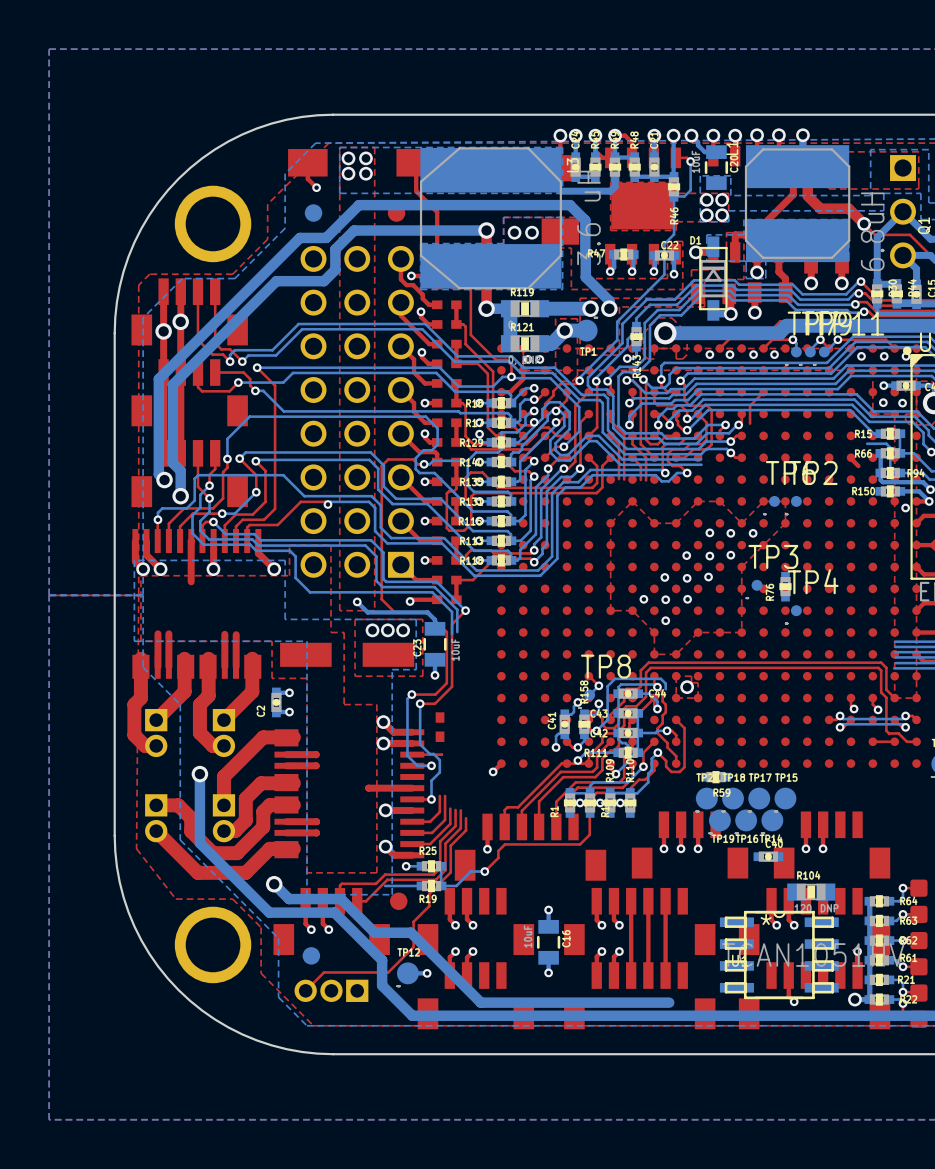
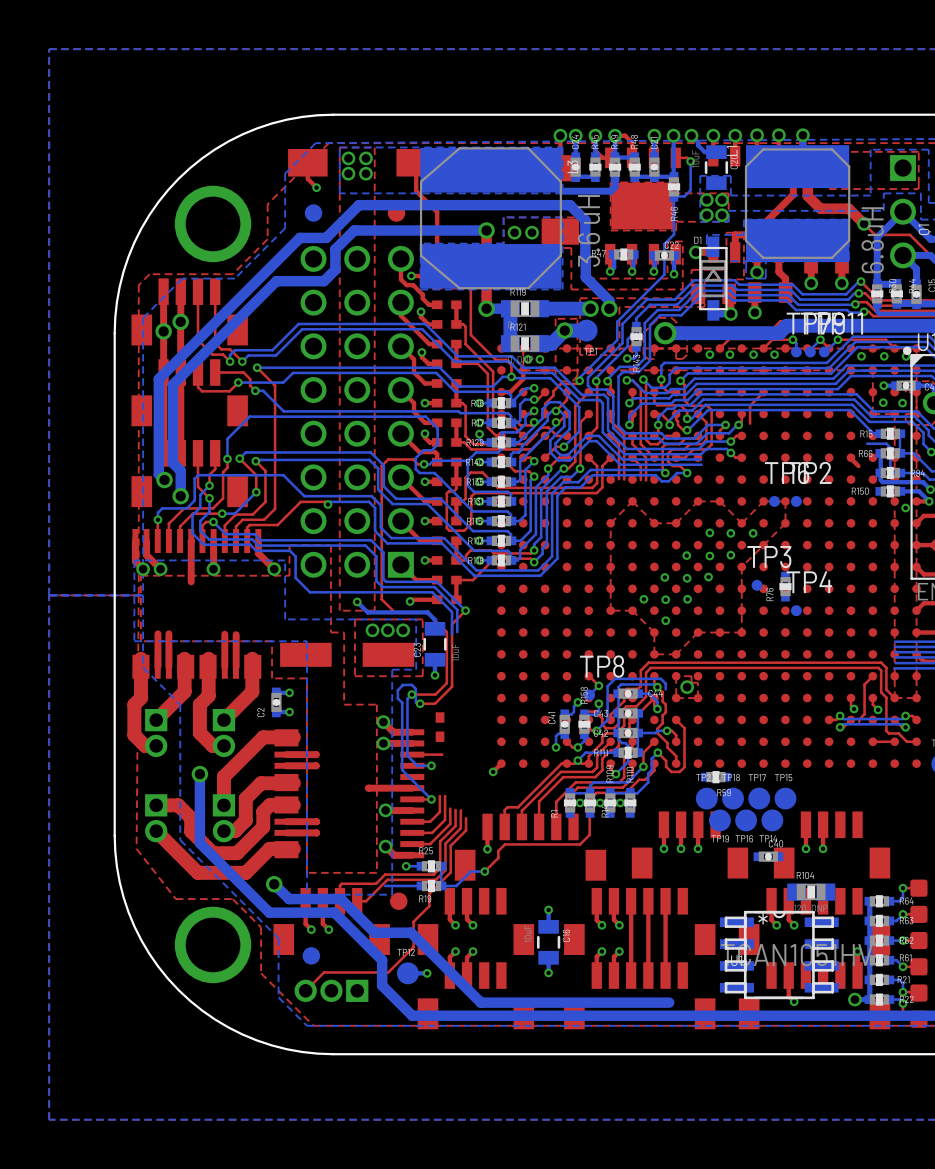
top track: none -> (872, 676) (864, 684) (864, 714) (859, 721)
bottom track: (420, 703) (420, 744) (429, 754) (433, 754) (439, 760) (439, 772) (431, 780) (431, 799) -> (415, 702) (415, 688) (411, 684) (402, 684) (397, 690) (397, 698) (402, 702) (402, 770) (431, 799)

